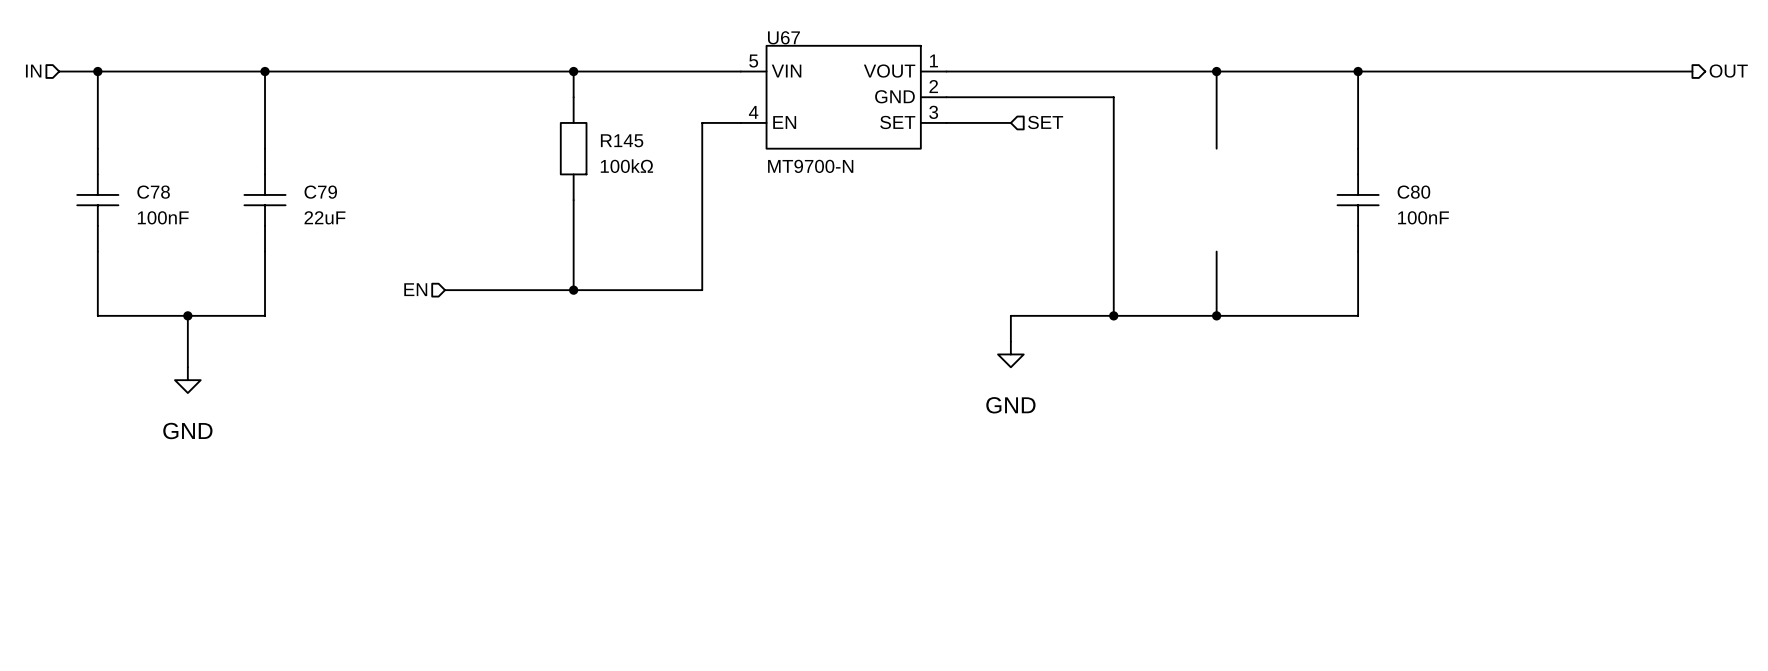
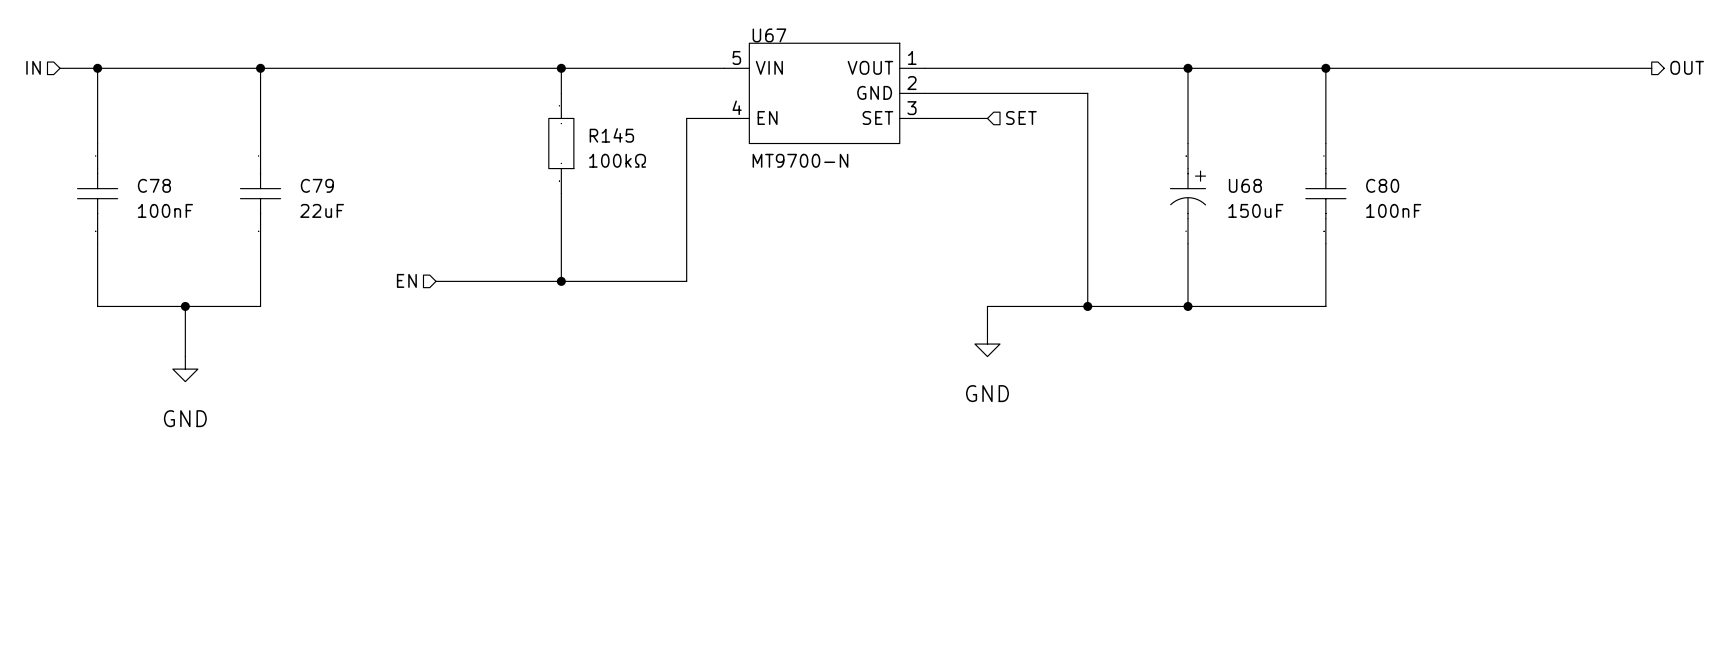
U68: none -> 150uF (1188, 193)

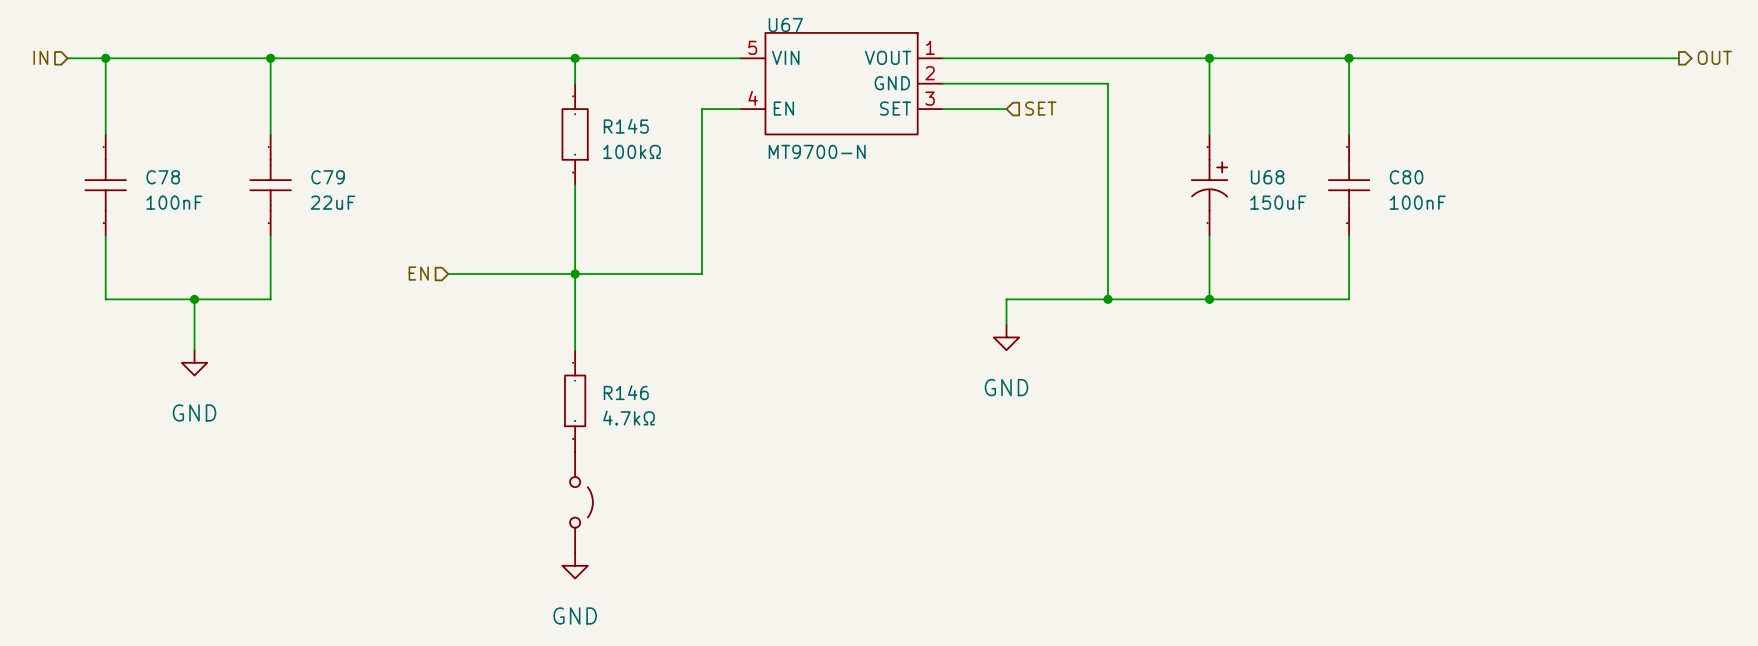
wire: none -> (575, 274) (575, 350)
R146: none -> 4.7kΩ (575, 400)
part: none -> (581, 502)
power symbol: none -> GND (575, 565)

